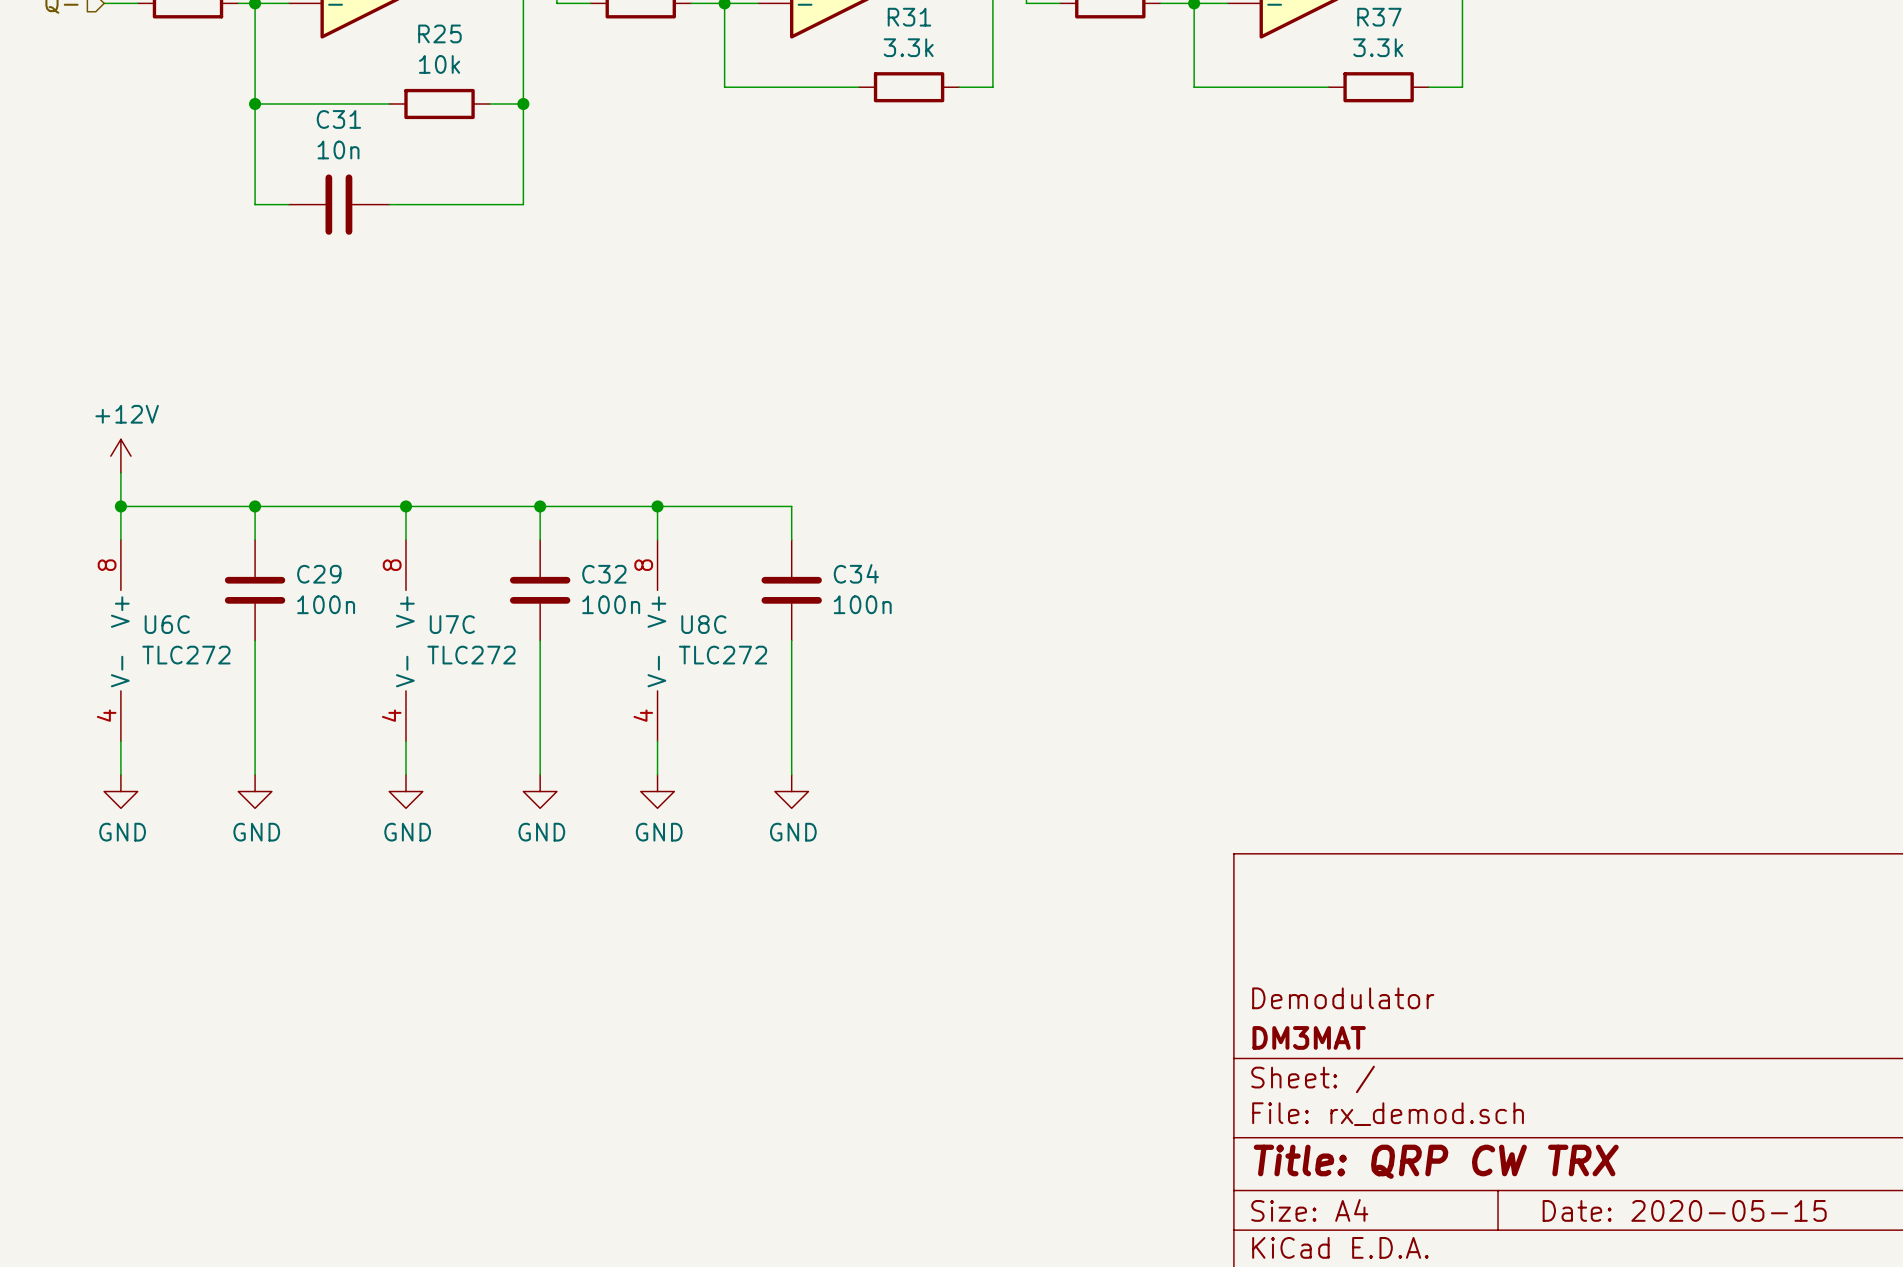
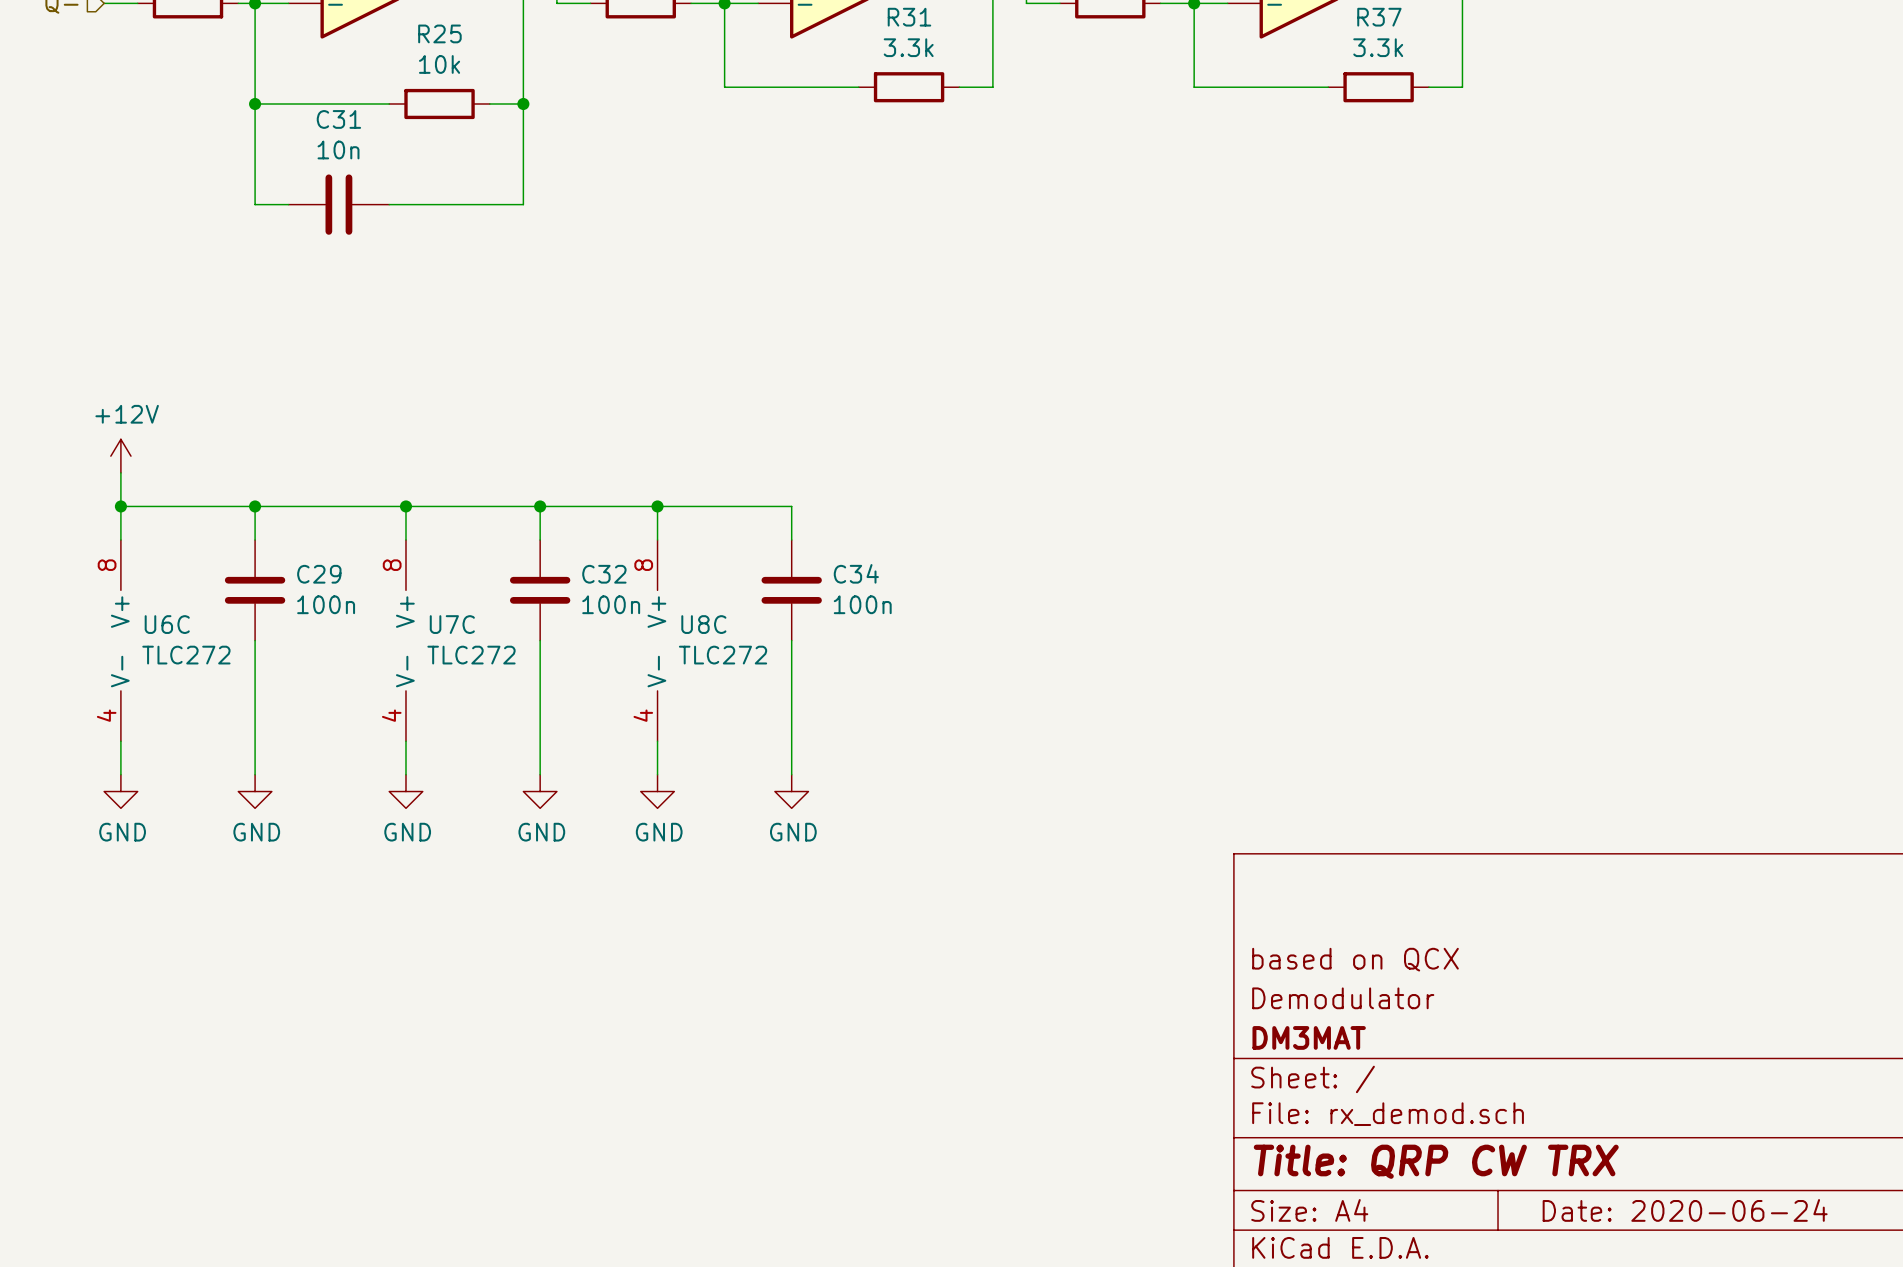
title block: none -> based on QCX (1355, 959)
title block: Date: 2020-05-15 (1684, 1210) -> Date: 2020-06-24 (1685, 1210)

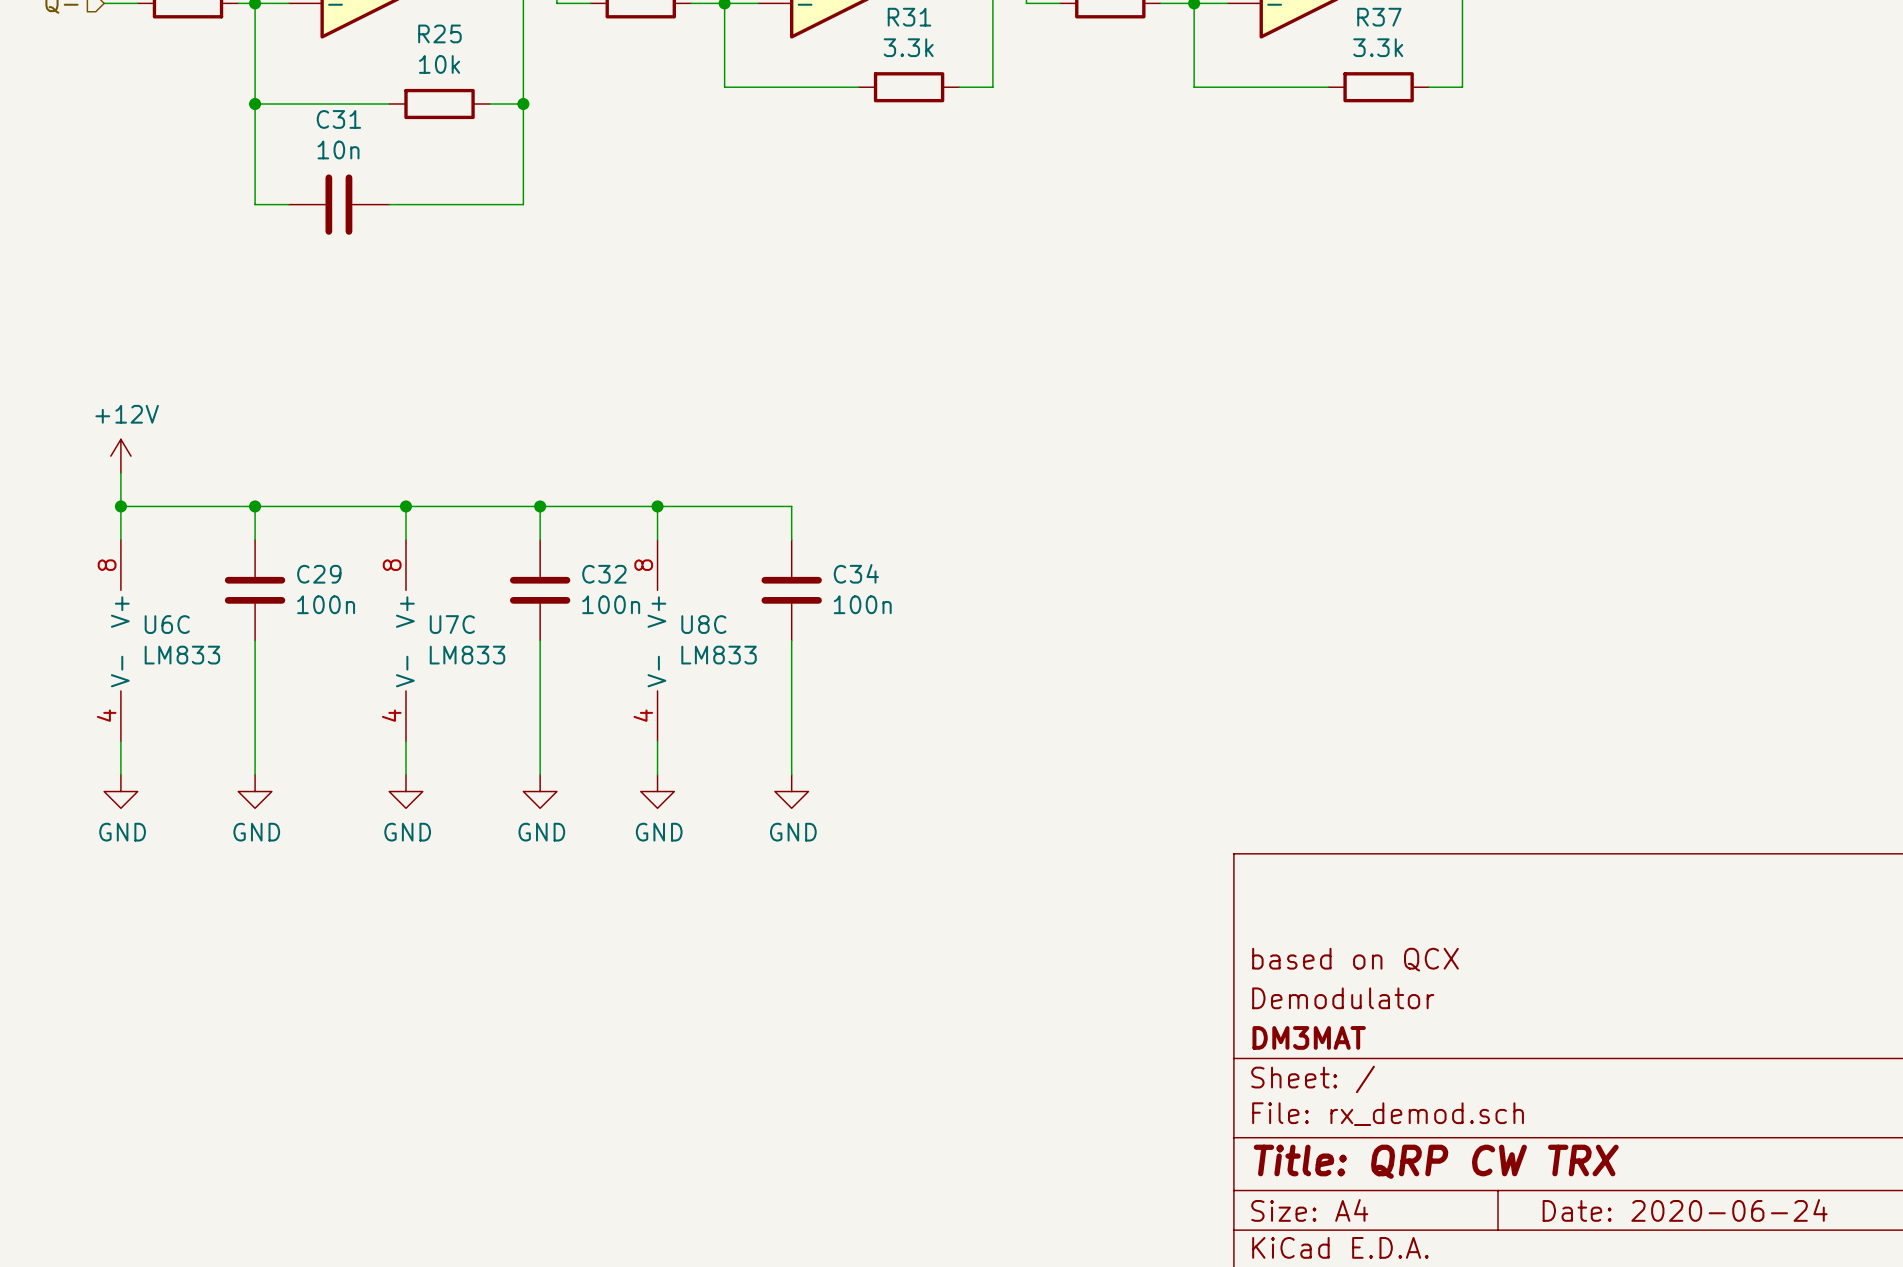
U6C value: TLC272 (186, 655) -> LM833 (182, 655)
U7C value: TLC272 (471, 655) -> LM833 (467, 655)
U8C value: TLC272 (723, 655) -> LM833 (719, 655)

